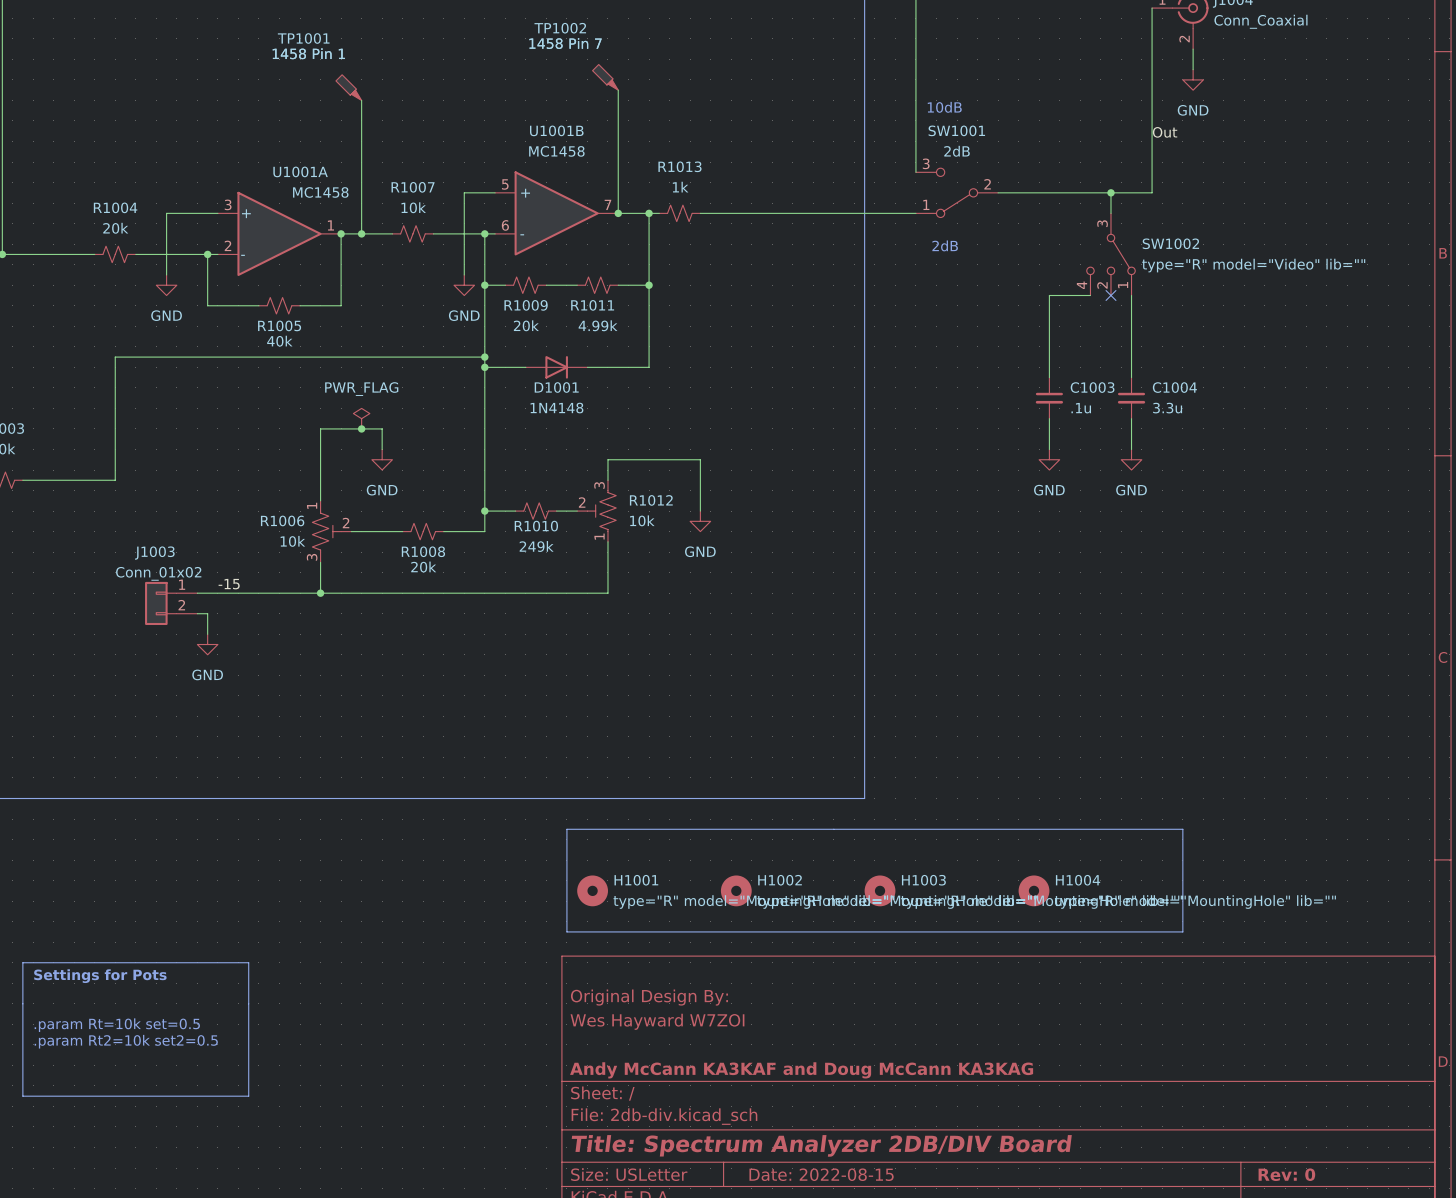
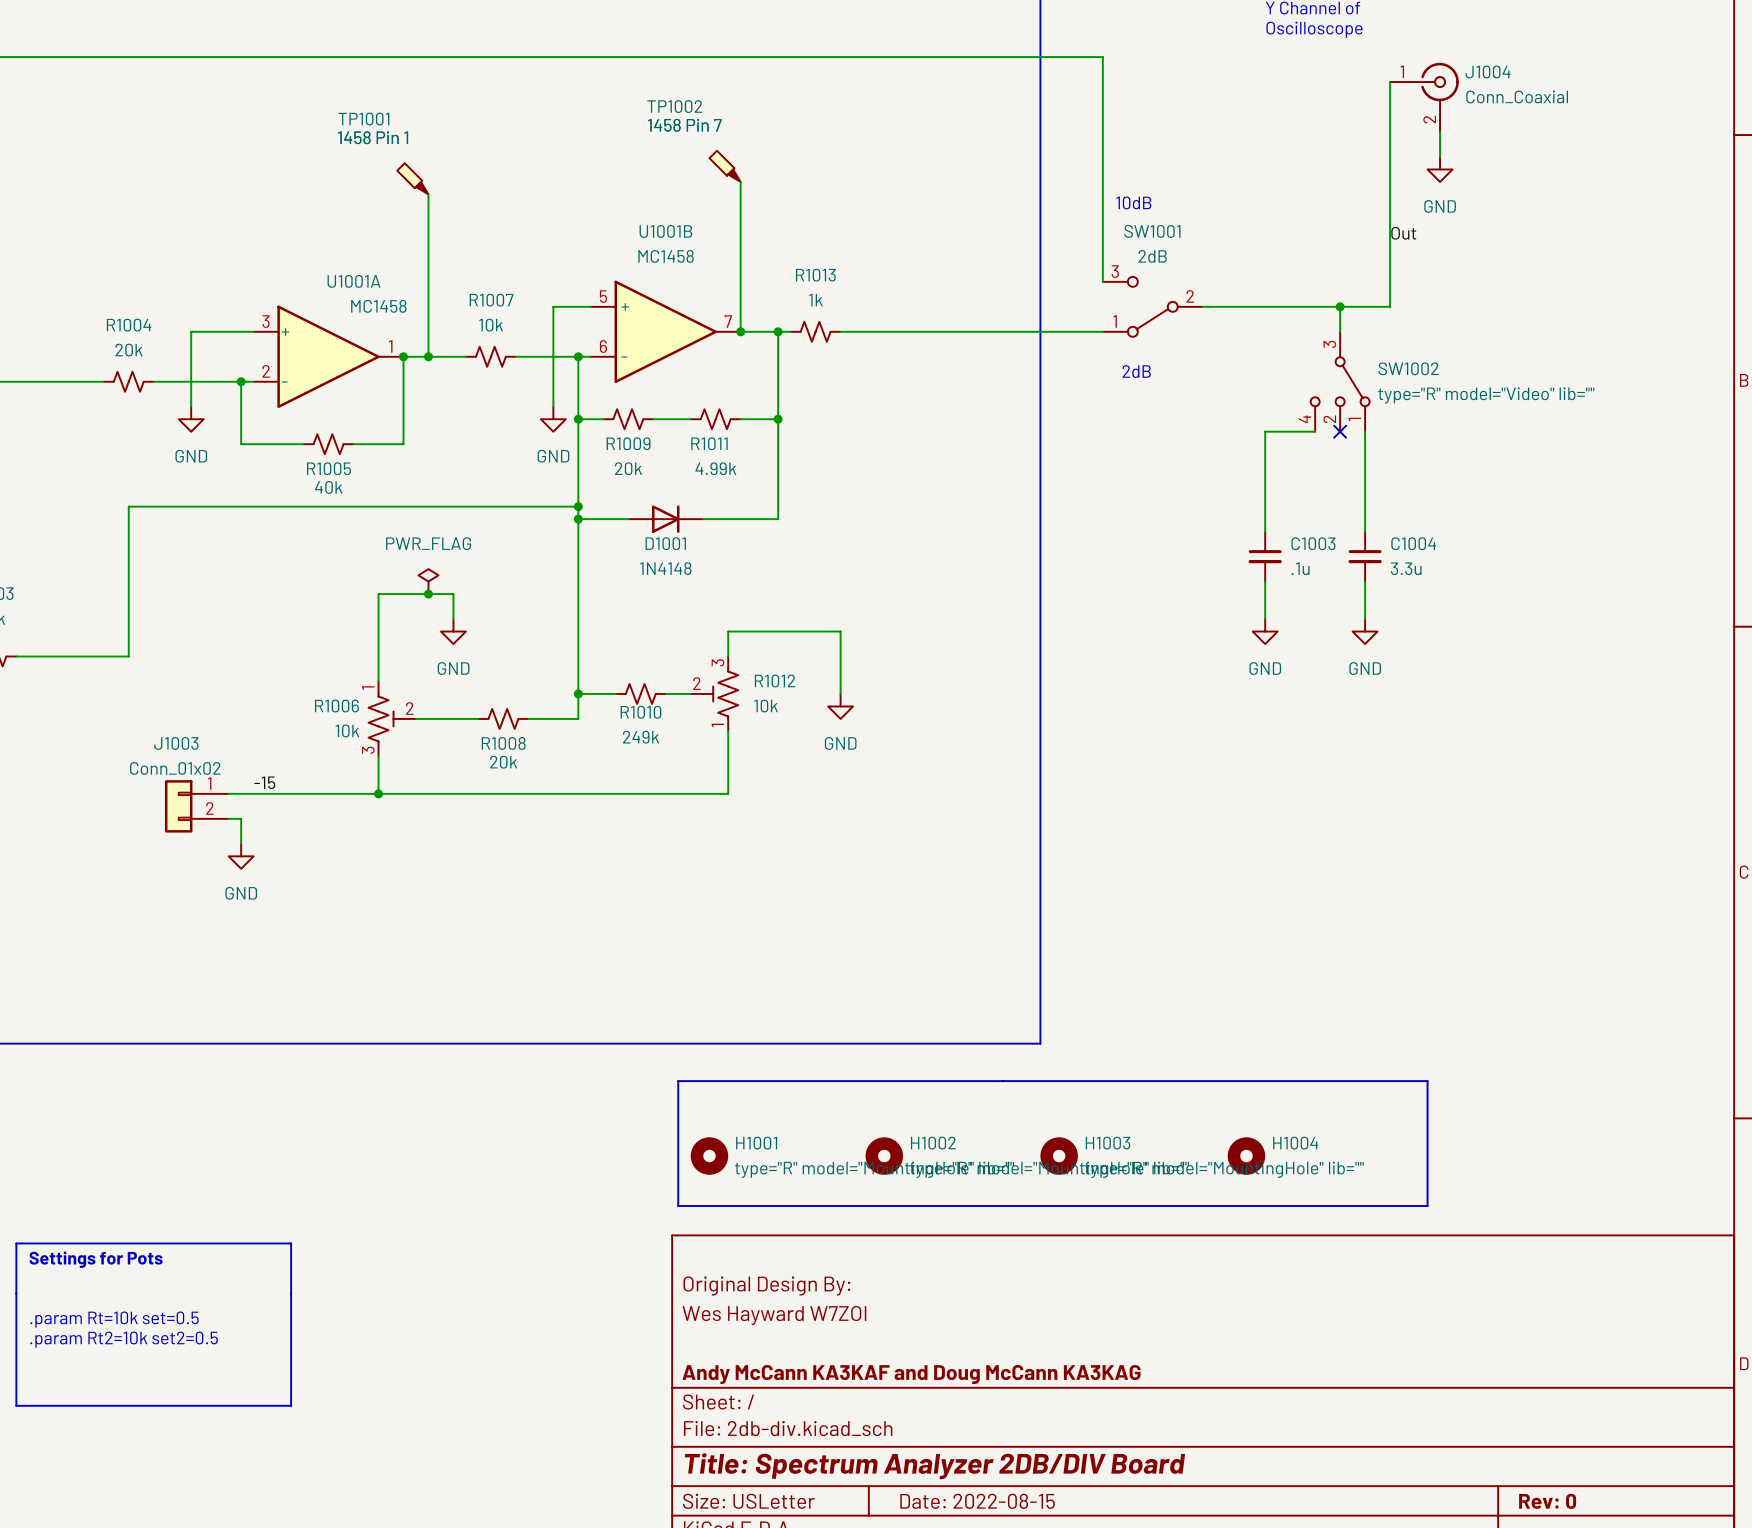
H1004 value: type="R" model="MountingHole" lib="" (1195, 902) -> none

